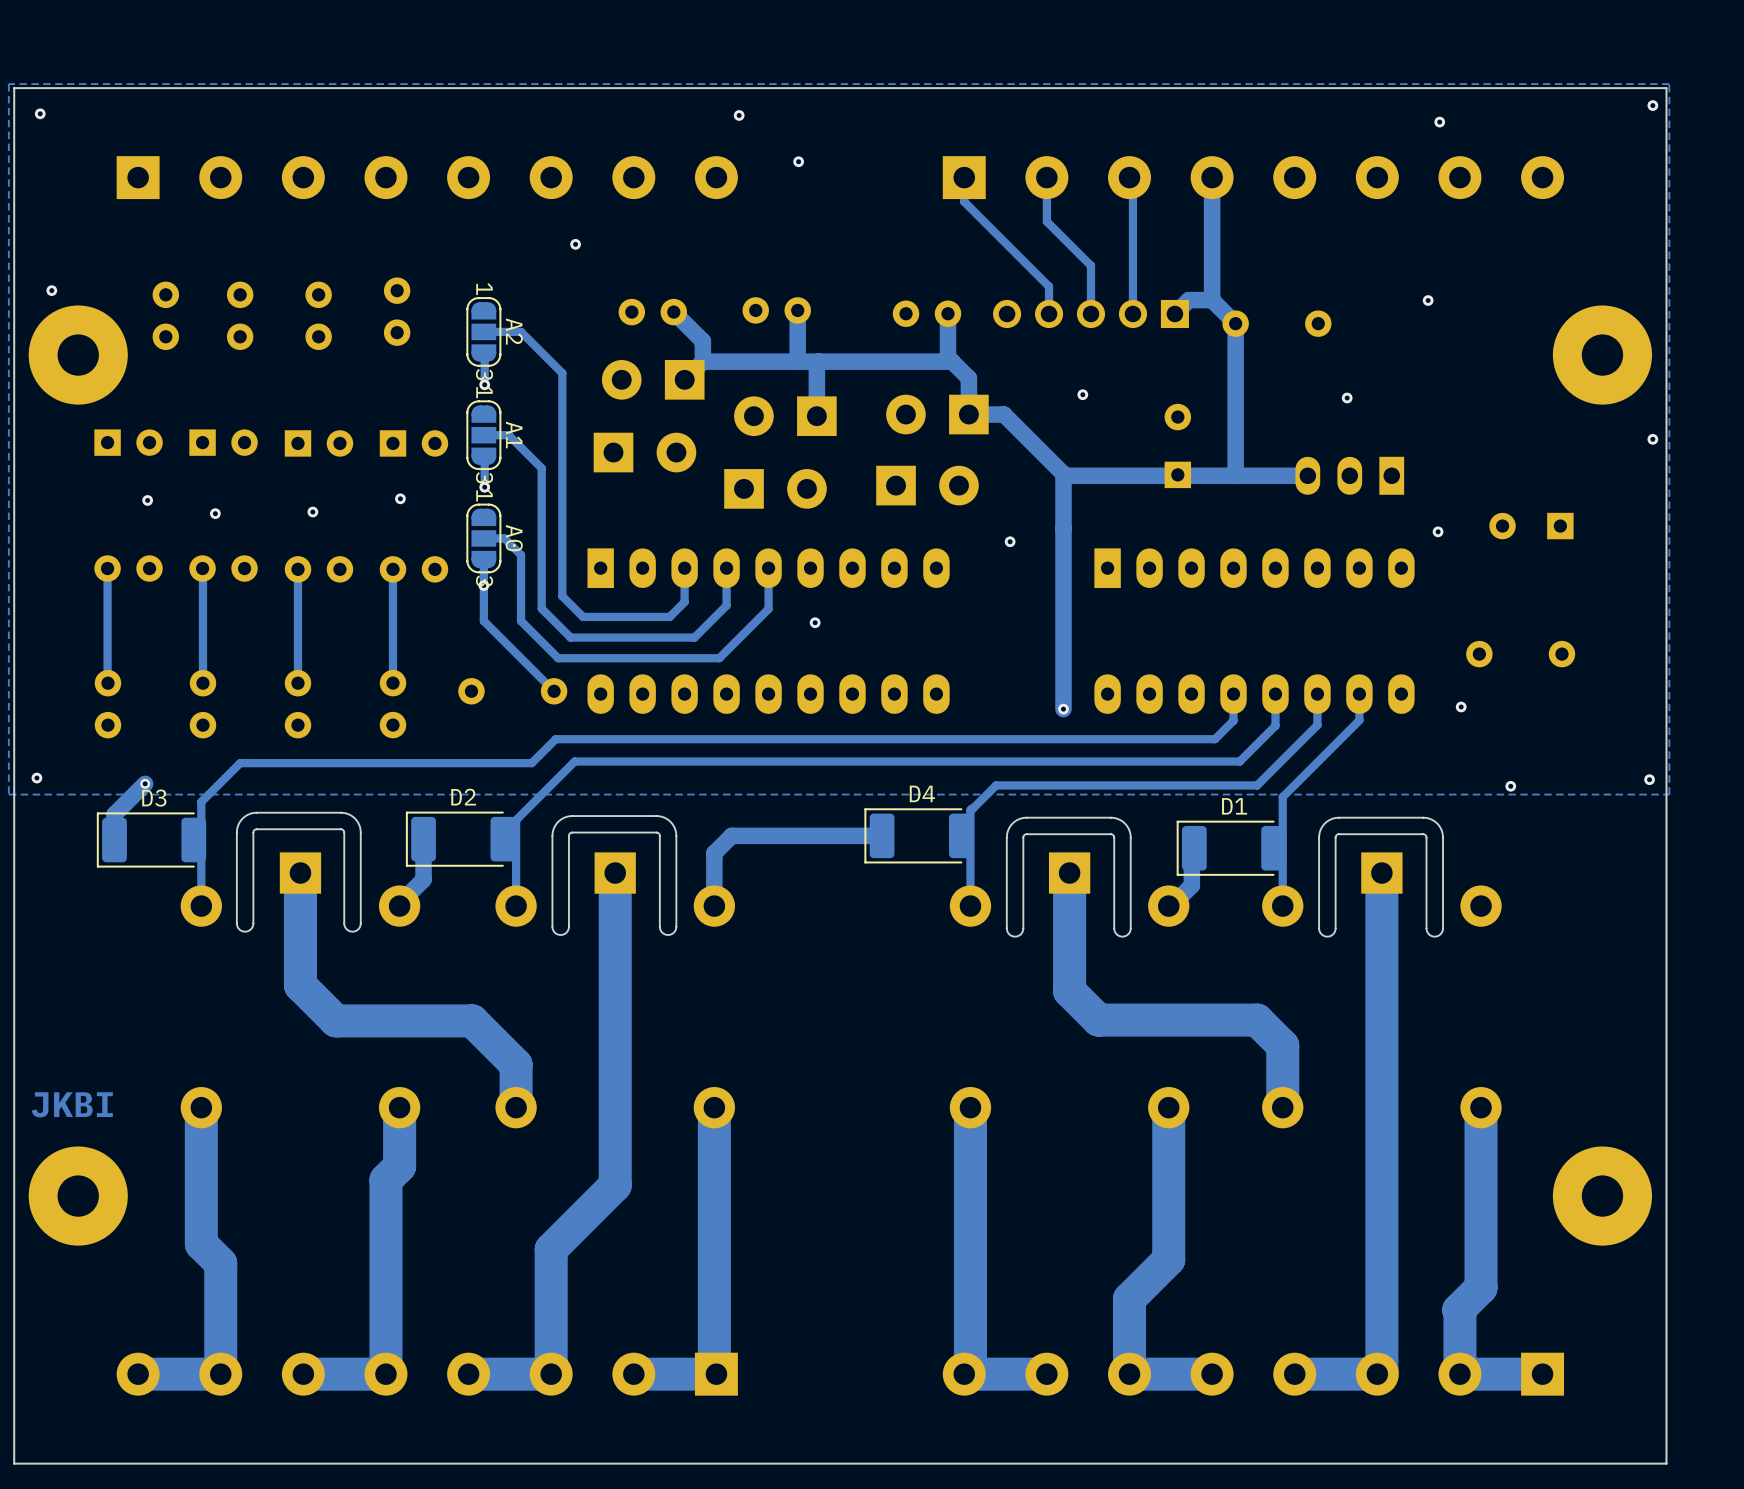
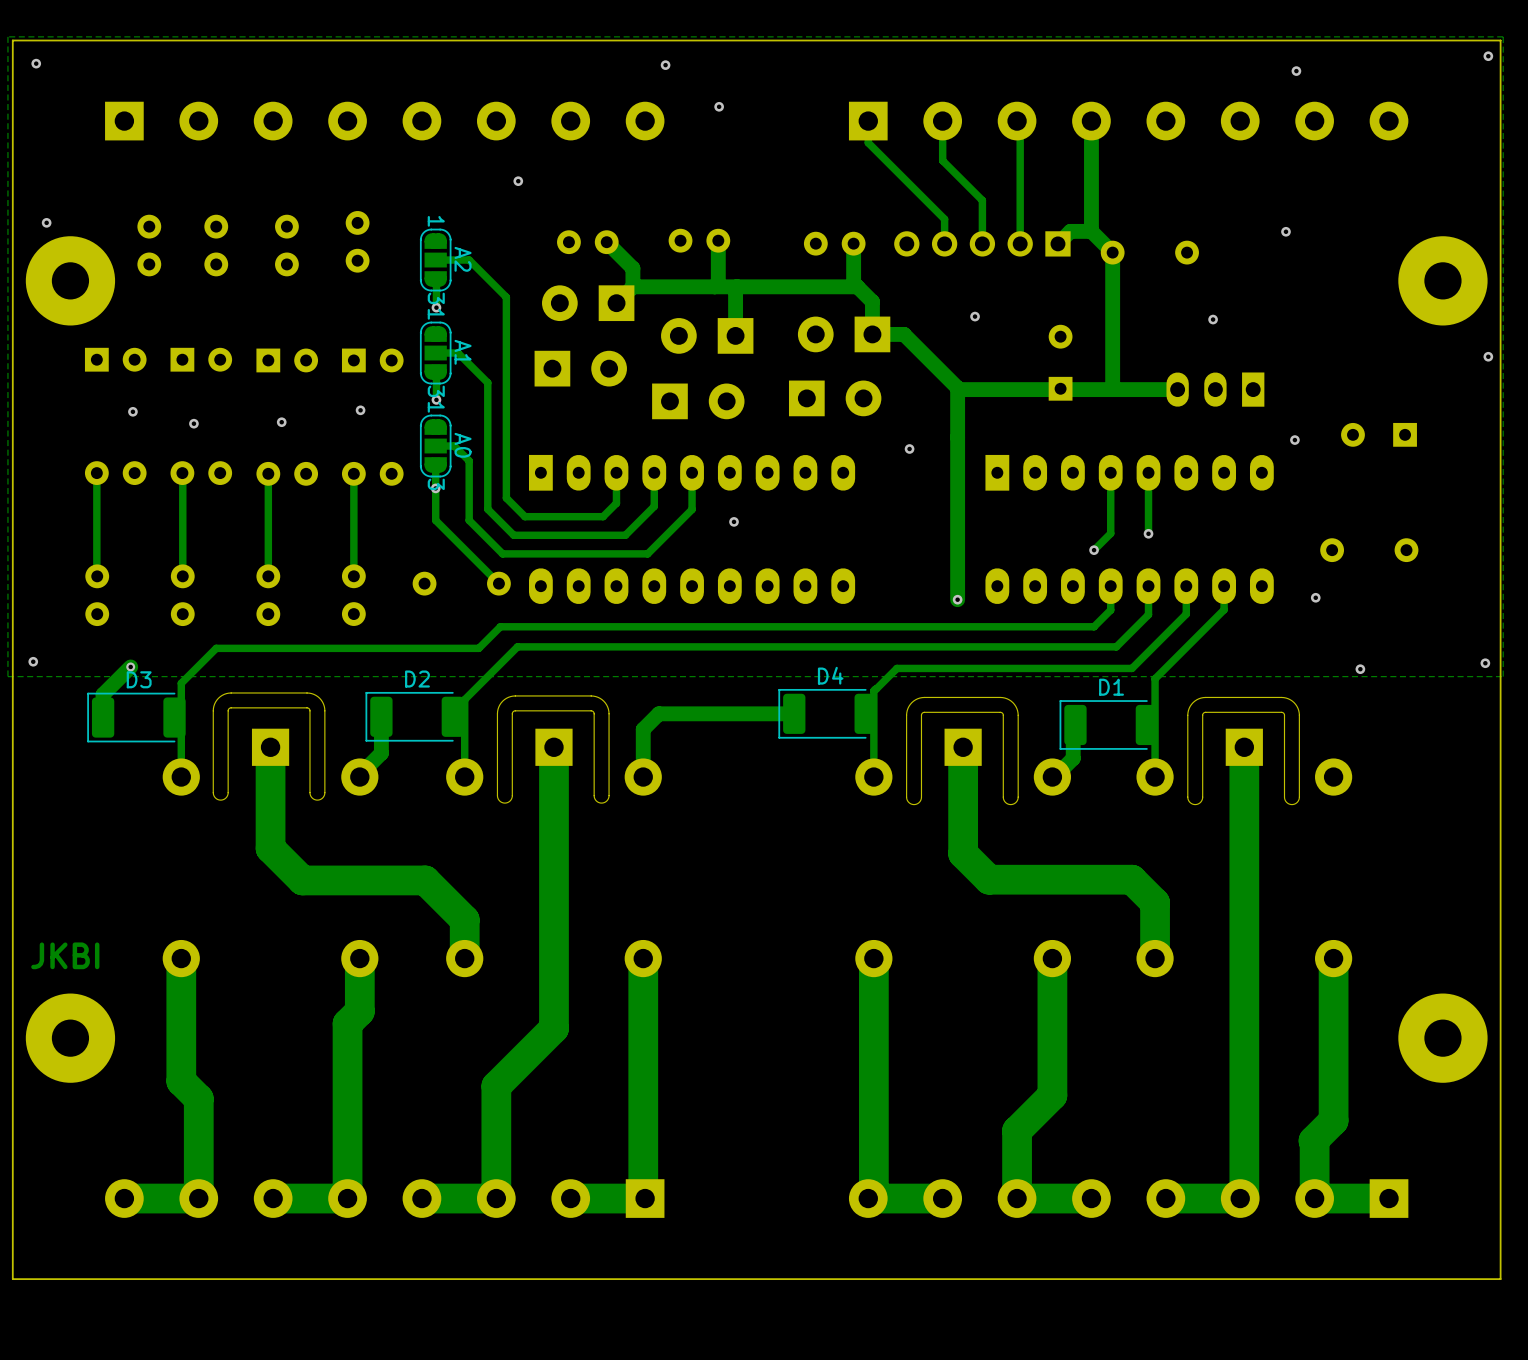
track: none -> (1110, 472) (1110, 533) (1094, 550)
track: none -> (1148, 472) (1148, 533)
via: none -> (1148, 533)
via: none -> (1094, 550)

